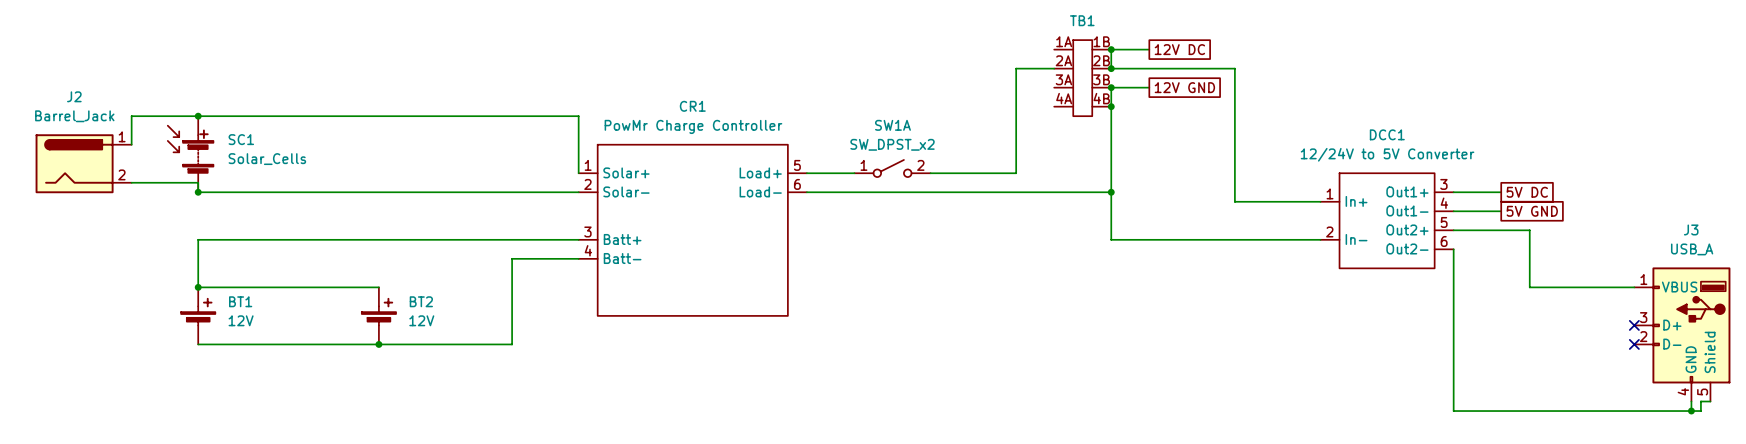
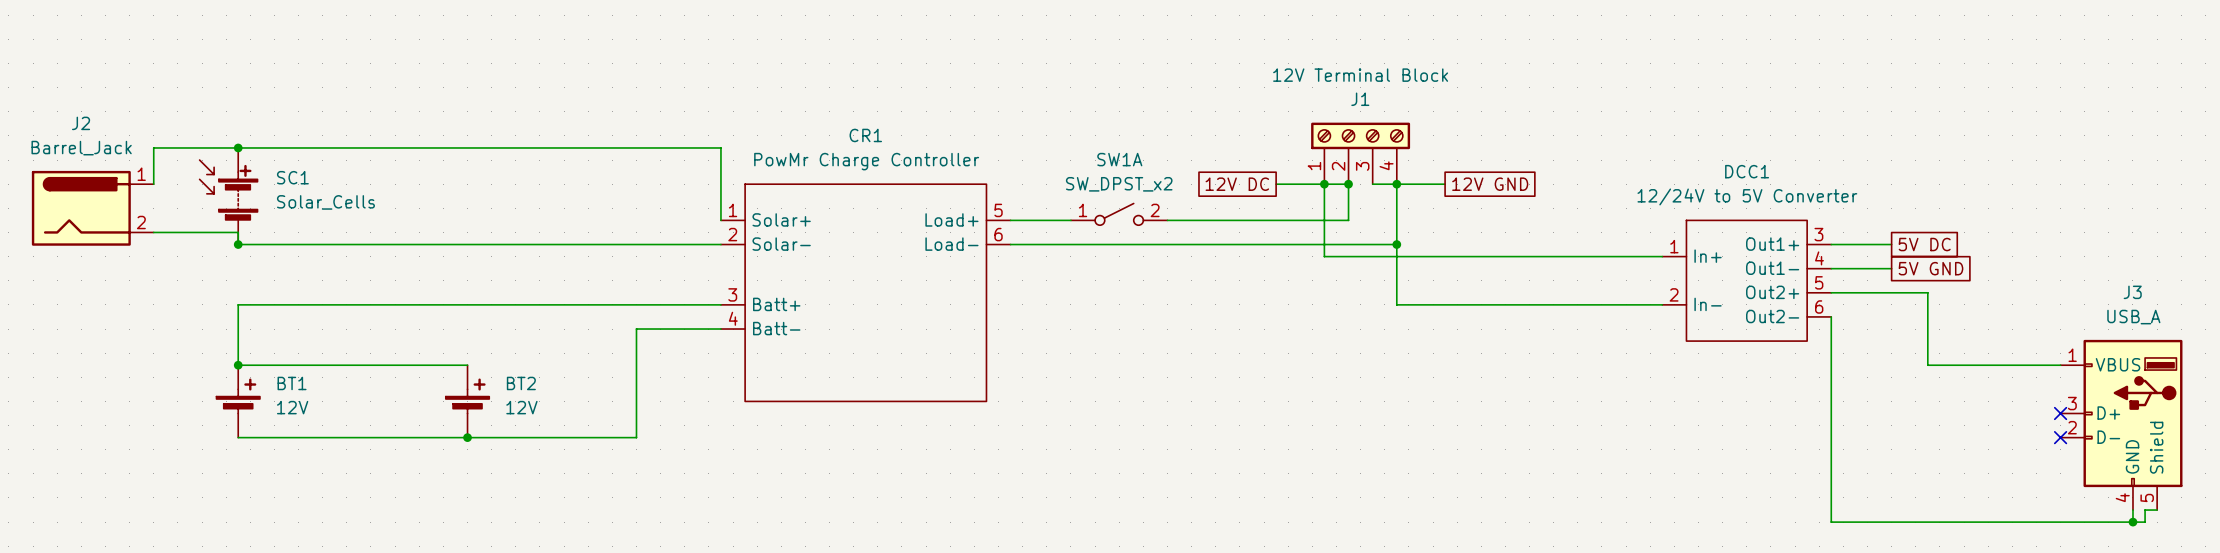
junction: (1111, 49) -> none
wire: (1149, 49) (1111, 49) (1111, 68) (1234, 68) (1234, 201) -> (1324, 184) (1324, 256) (1553, 256)
global label rotation: 0° (1179, 49) -> 180° (1237, 184)
global label position: 12V DC (1179, 49) -> 12V DC (1237, 184)
wire: (1054, 68) (1016, 68) (1016, 173) -> (1276, 184) (1348, 184) (1348, 220) (1276, 220)
junction: (1111, 68) -> none
TB1: (1082, 78) -> none
junction: (1111, 87) -> none
wire: (1149, 87) (1111, 87) (1111, 144) -> none
global label position: 12V GND (1184, 87) -> 12V GND (1490, 184)
junction: (1111, 106) -> none
J1: none -> 12V Terminal Block (1360, 153)
junction: none -> (1324, 184)
junction: none -> (1348, 184)
wire: none -> (1372, 184) (1445, 184)
junction: none -> (1396, 184)

